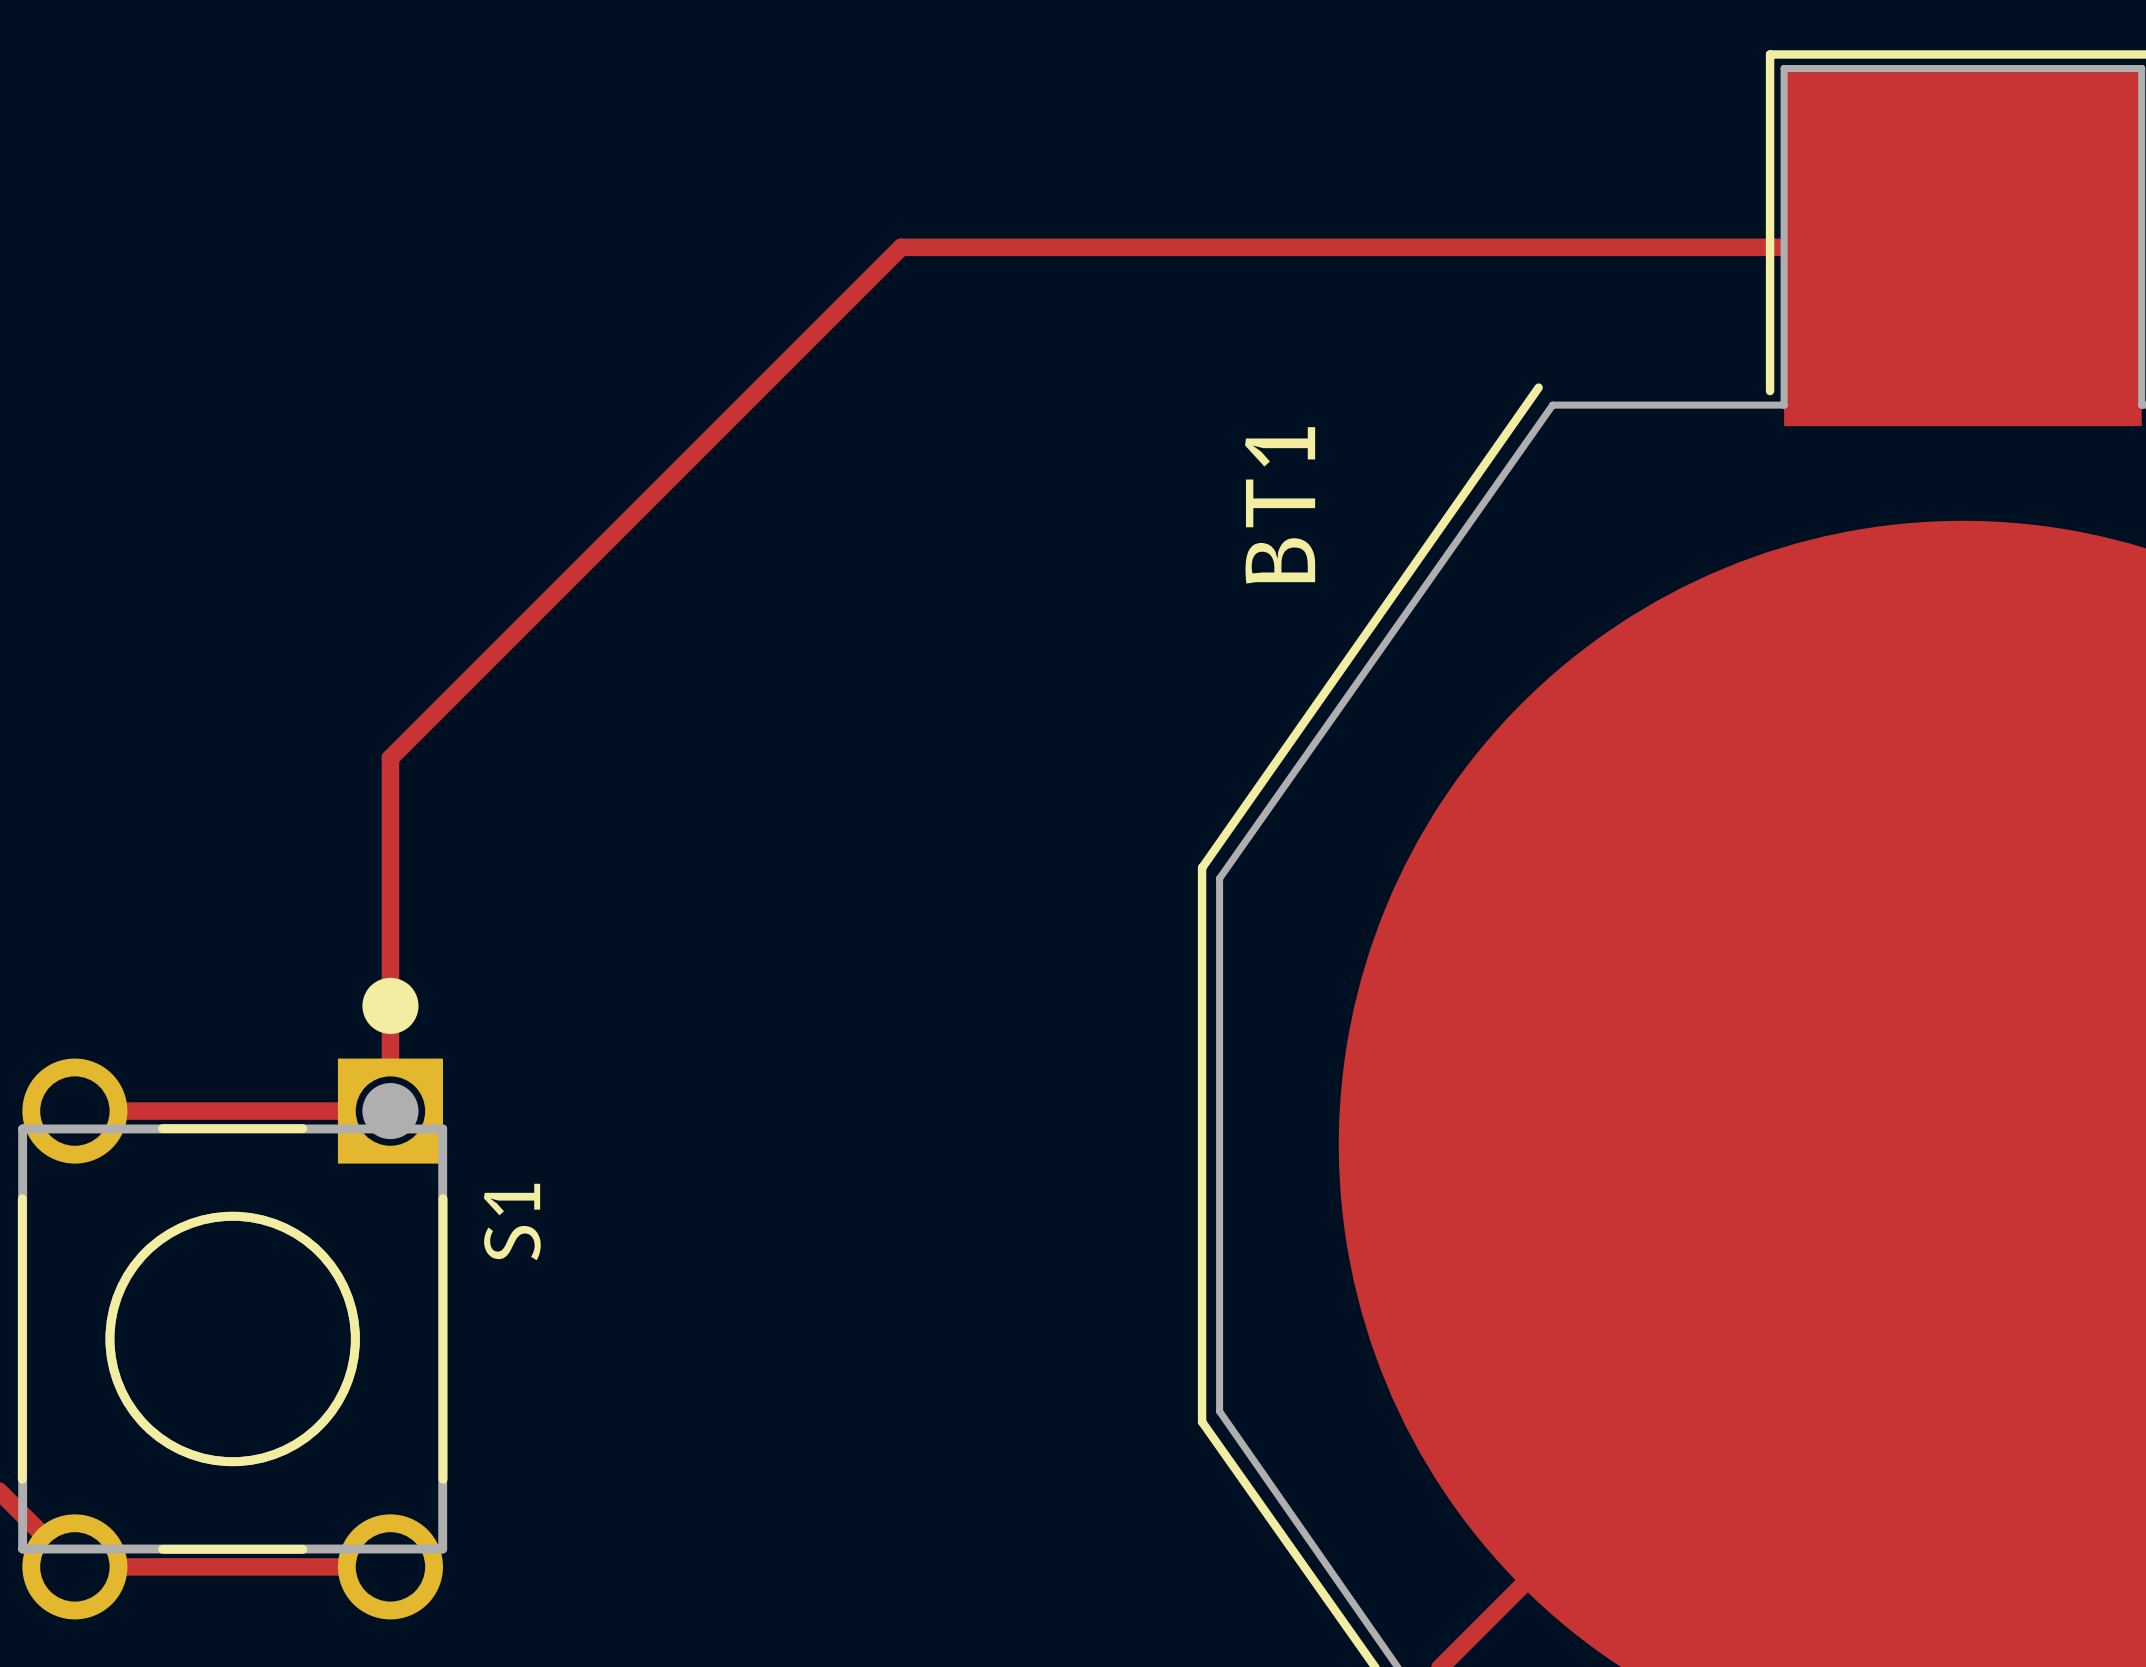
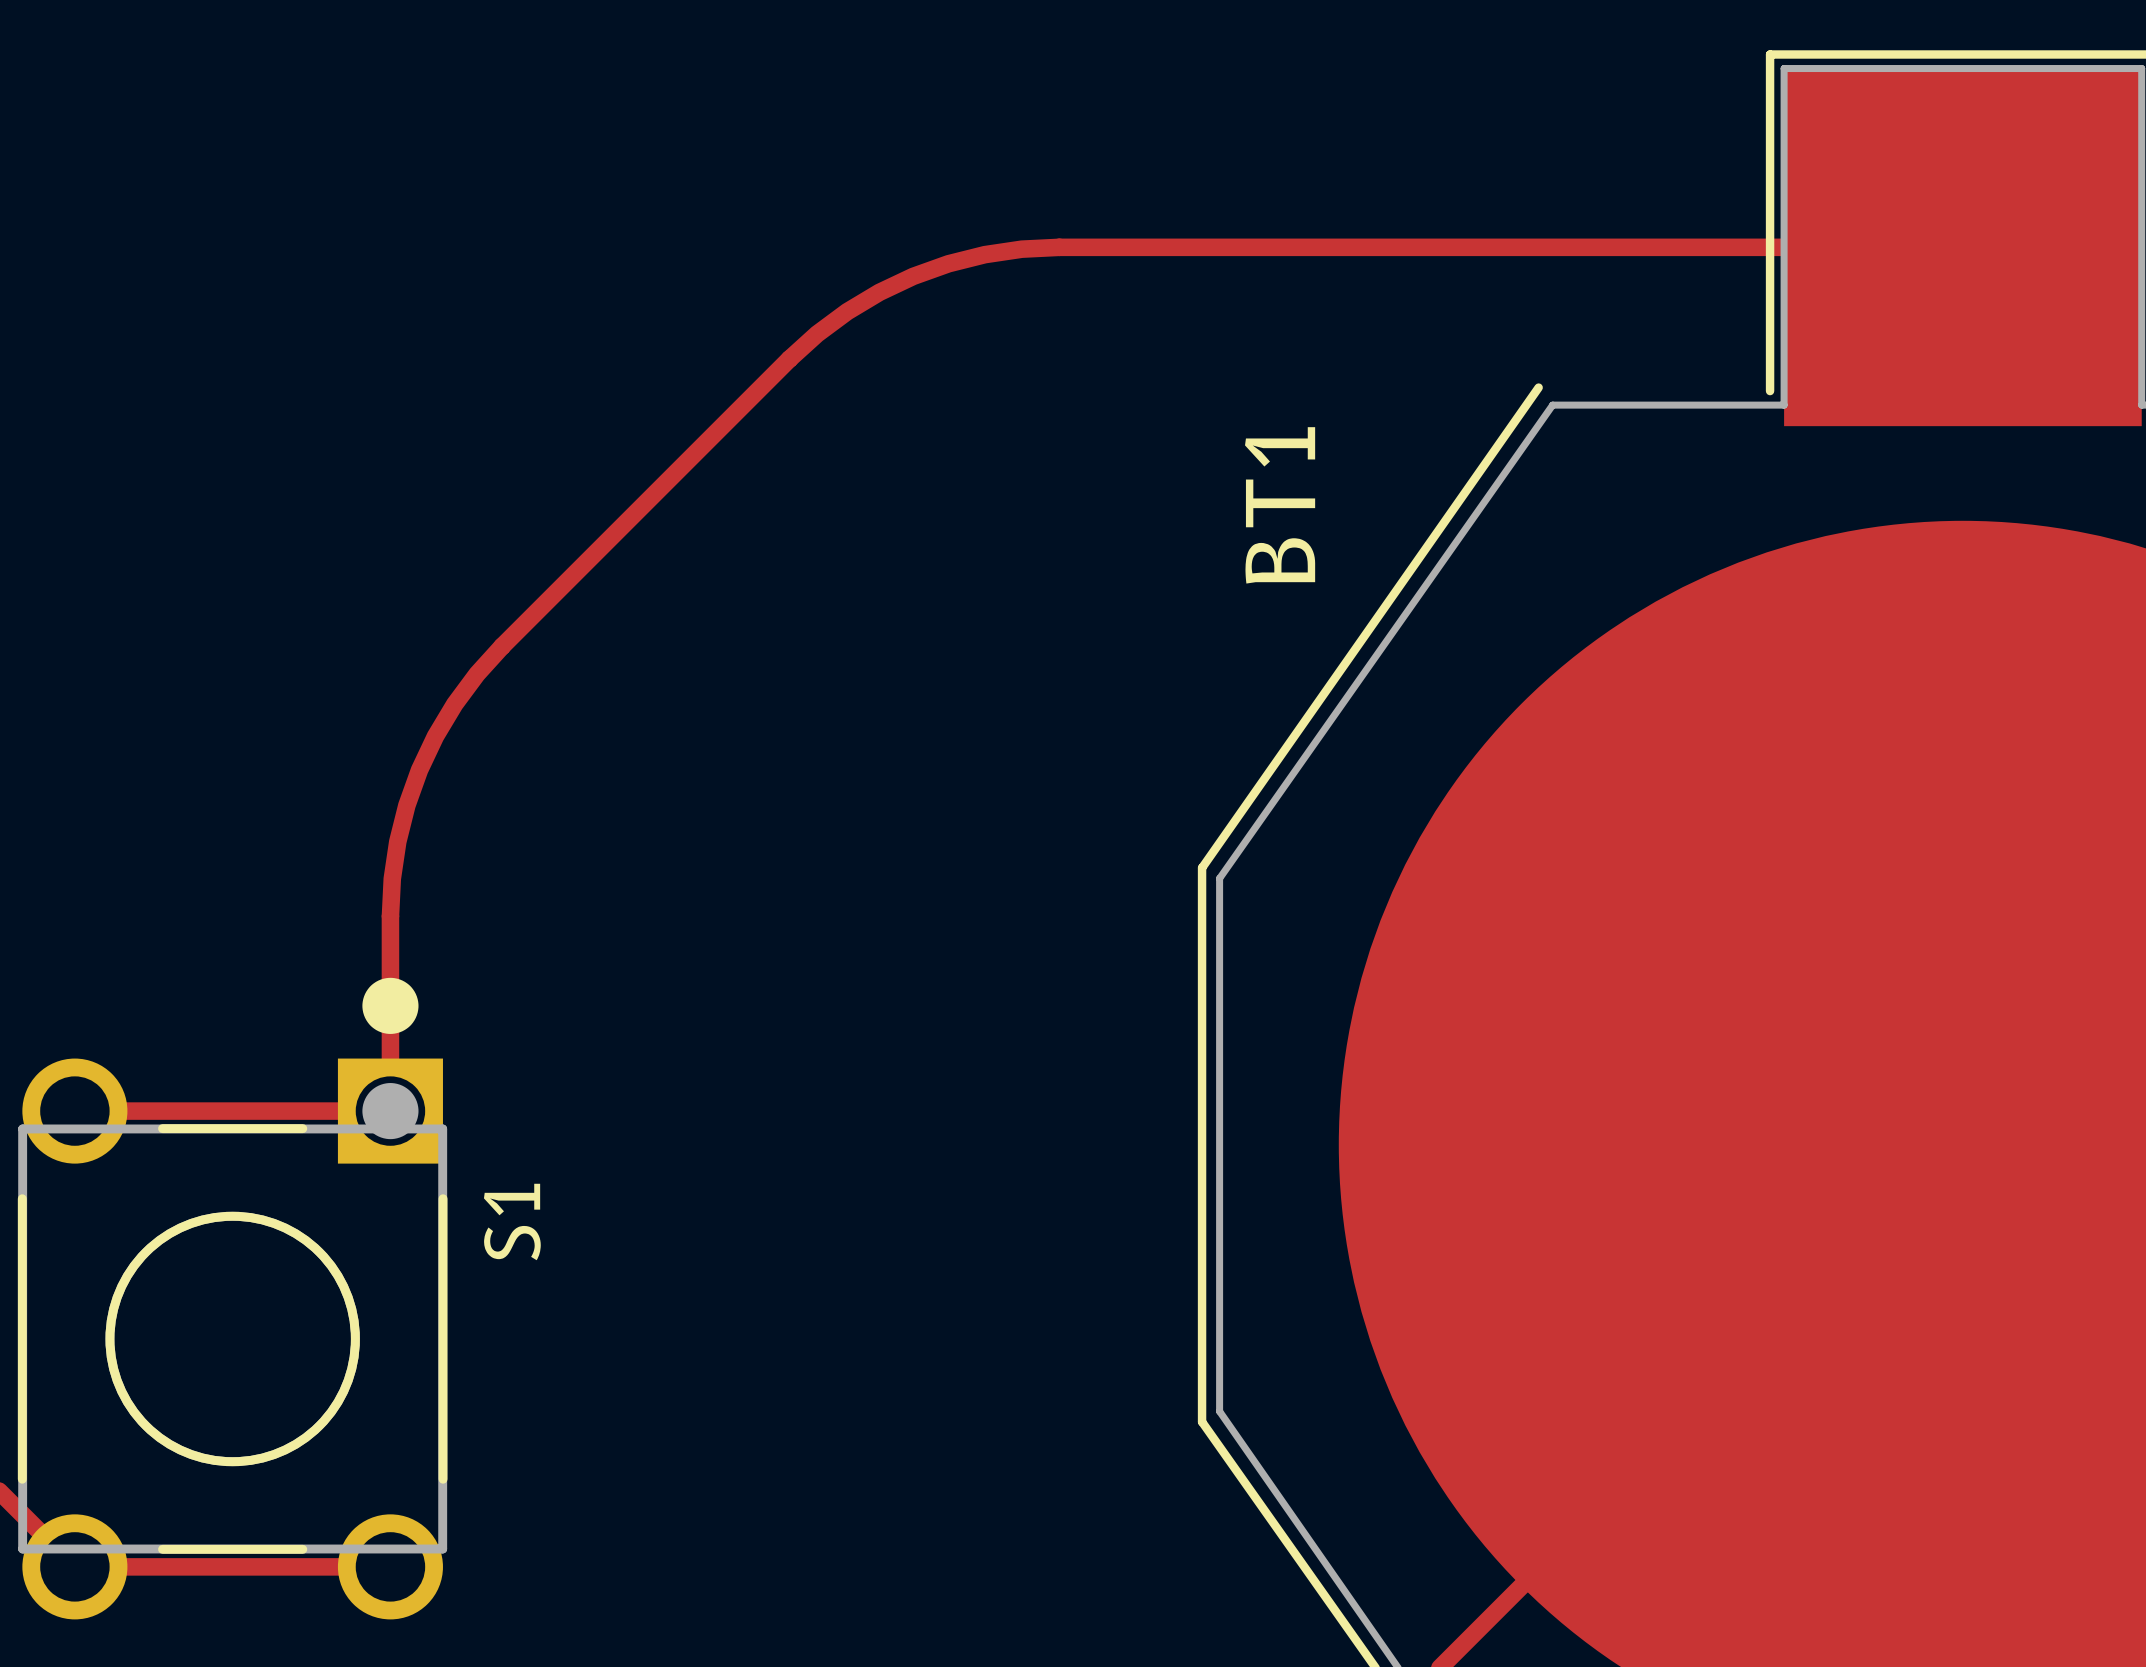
track: (1059, 247) (901, 247) (789, 359) -> (1059, 247) (1021, 249) (984, 254) (948, 263) (913, 276) (879, 292) (847, 311) (817, 333) (789, 359)
track: (502, 646) (390, 758) (390, 916) -> (502, 646) (477, 674) (454, 704) (435, 736) (419, 770) (406, 805) (397, 841) (392, 878) (390, 916)

